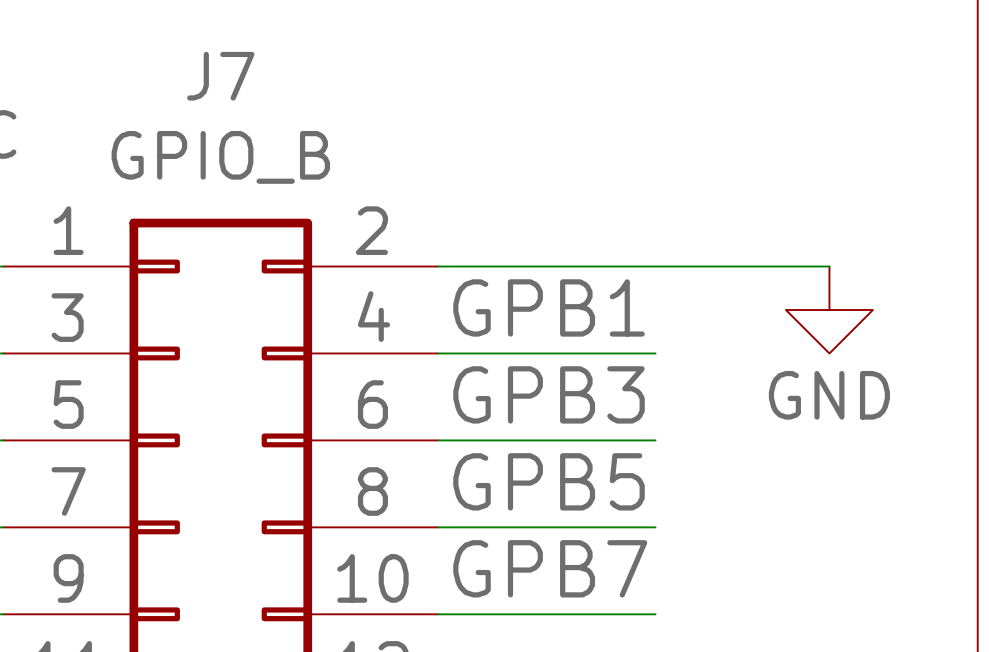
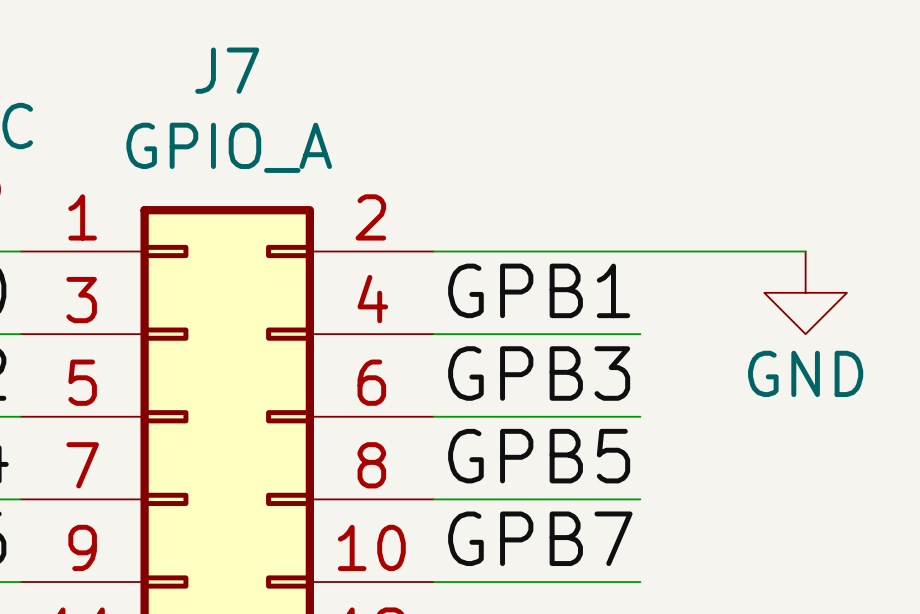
J7 value: GPIO_B (220, 157) -> GPIO_A (229, 147)

